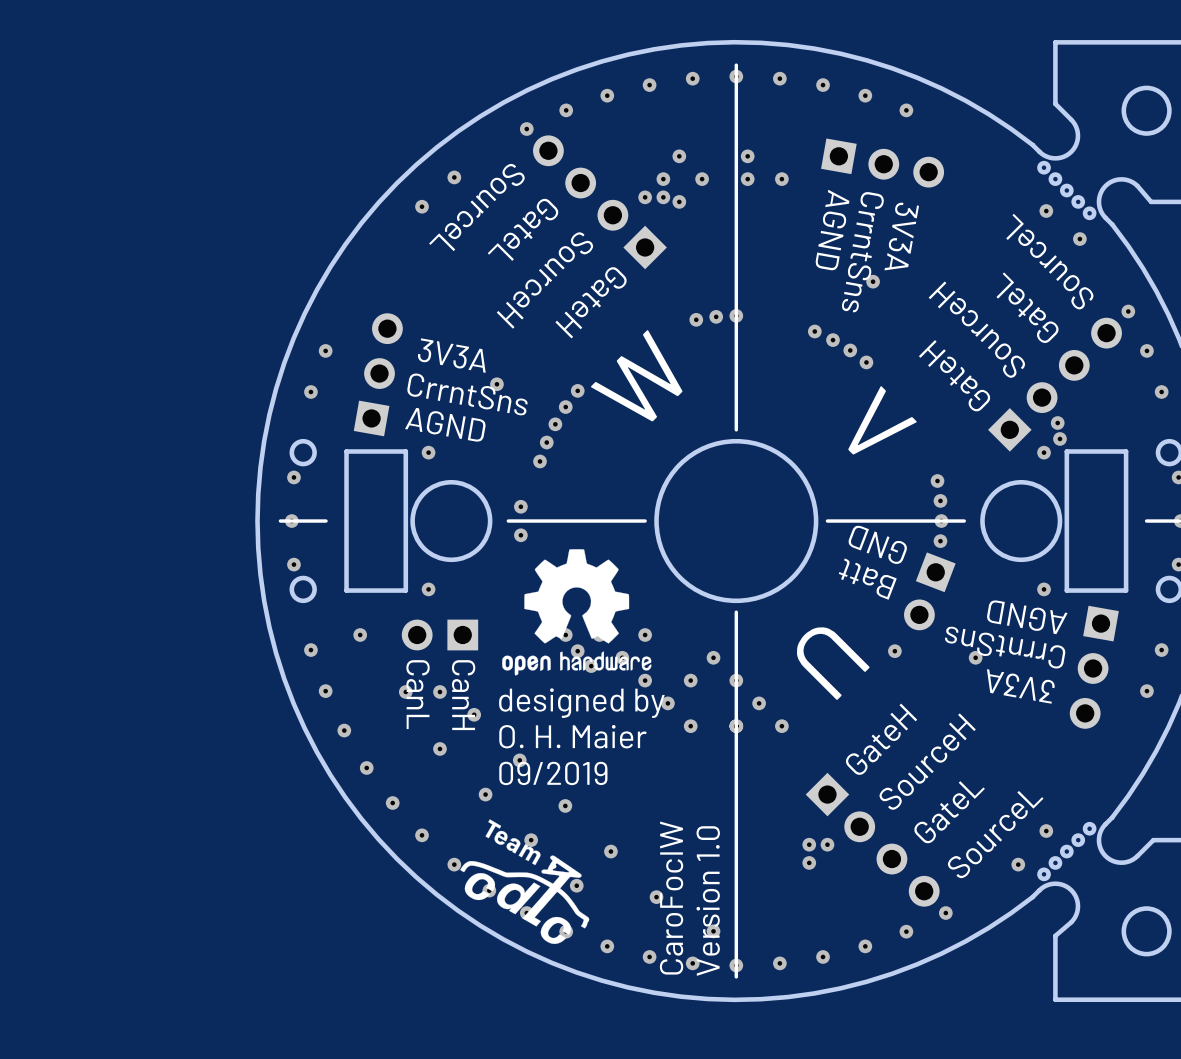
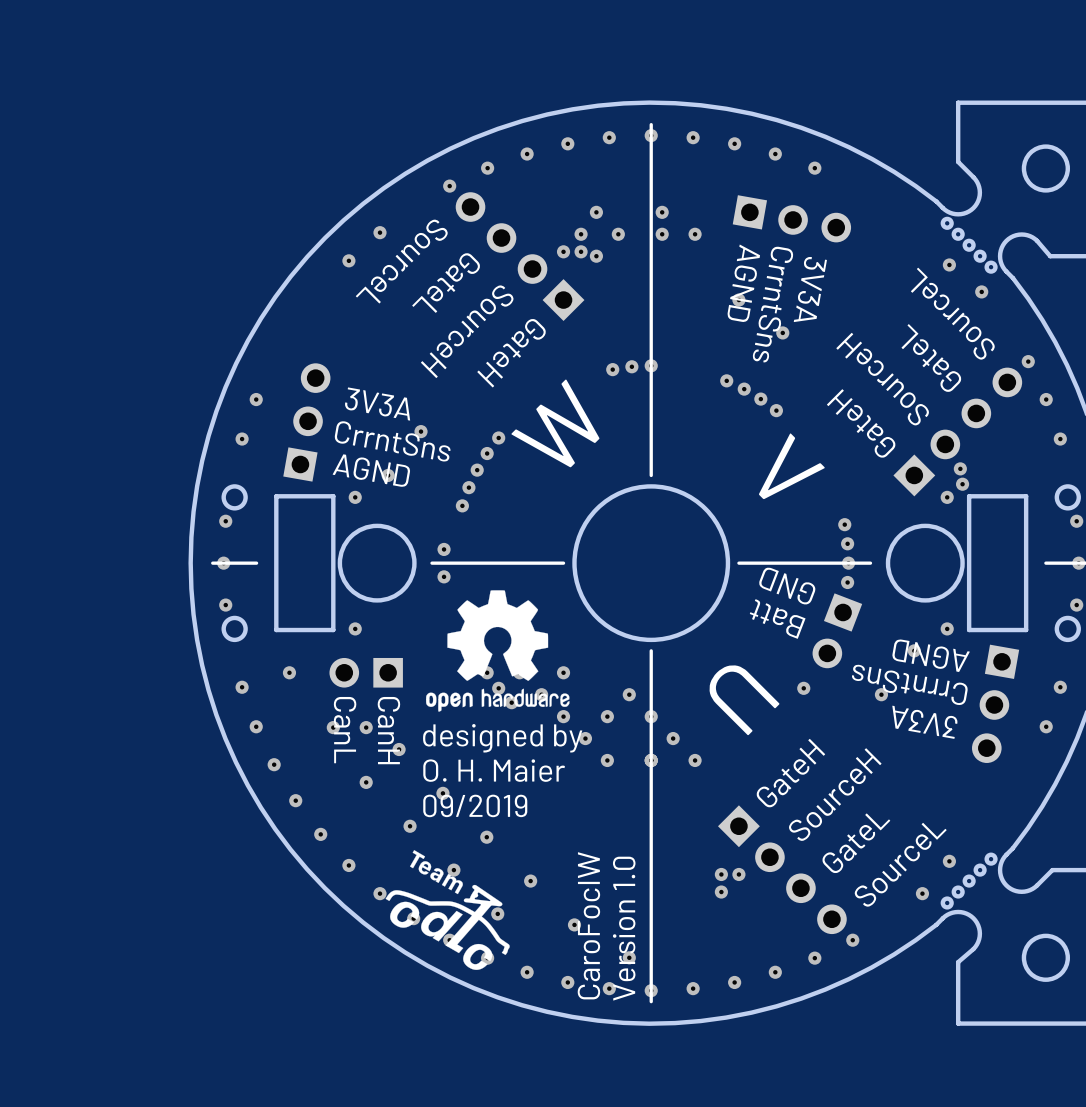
via: none -> (738, 300)
via: none -> (388, 475)
via: none -> (914, 650)

